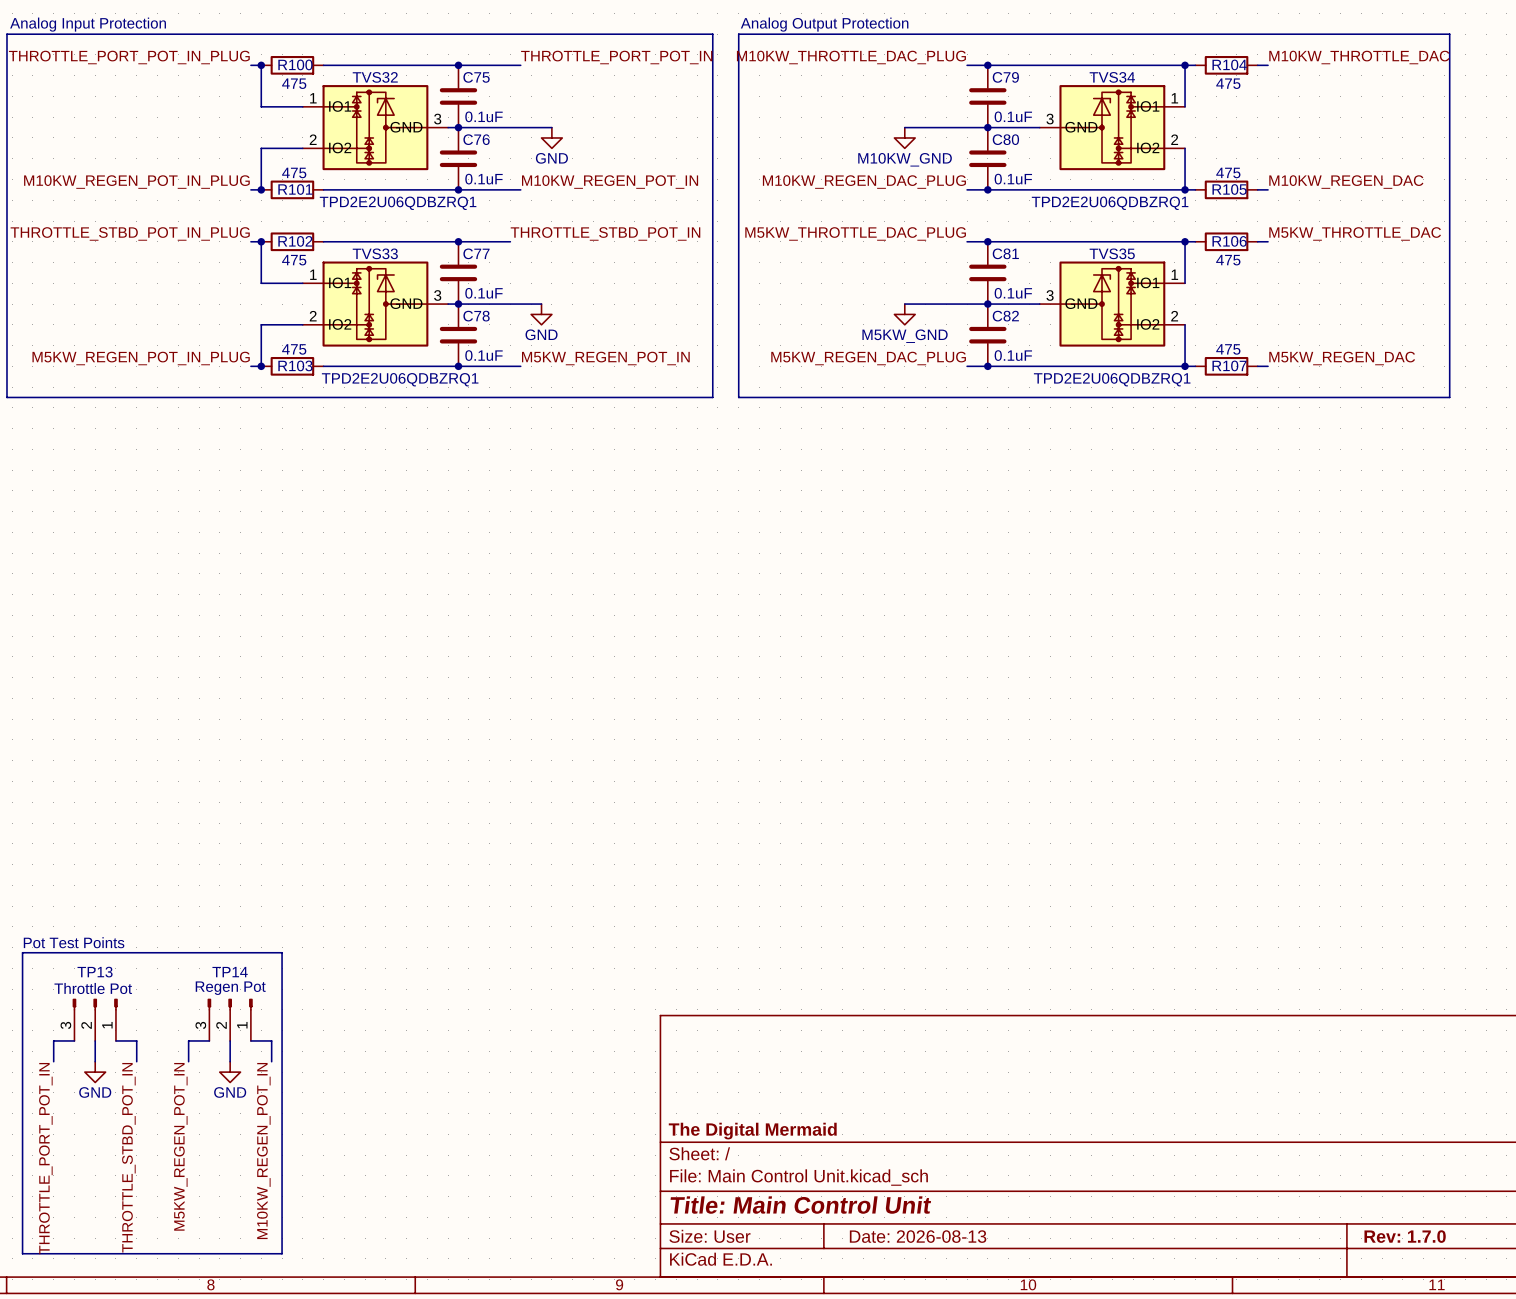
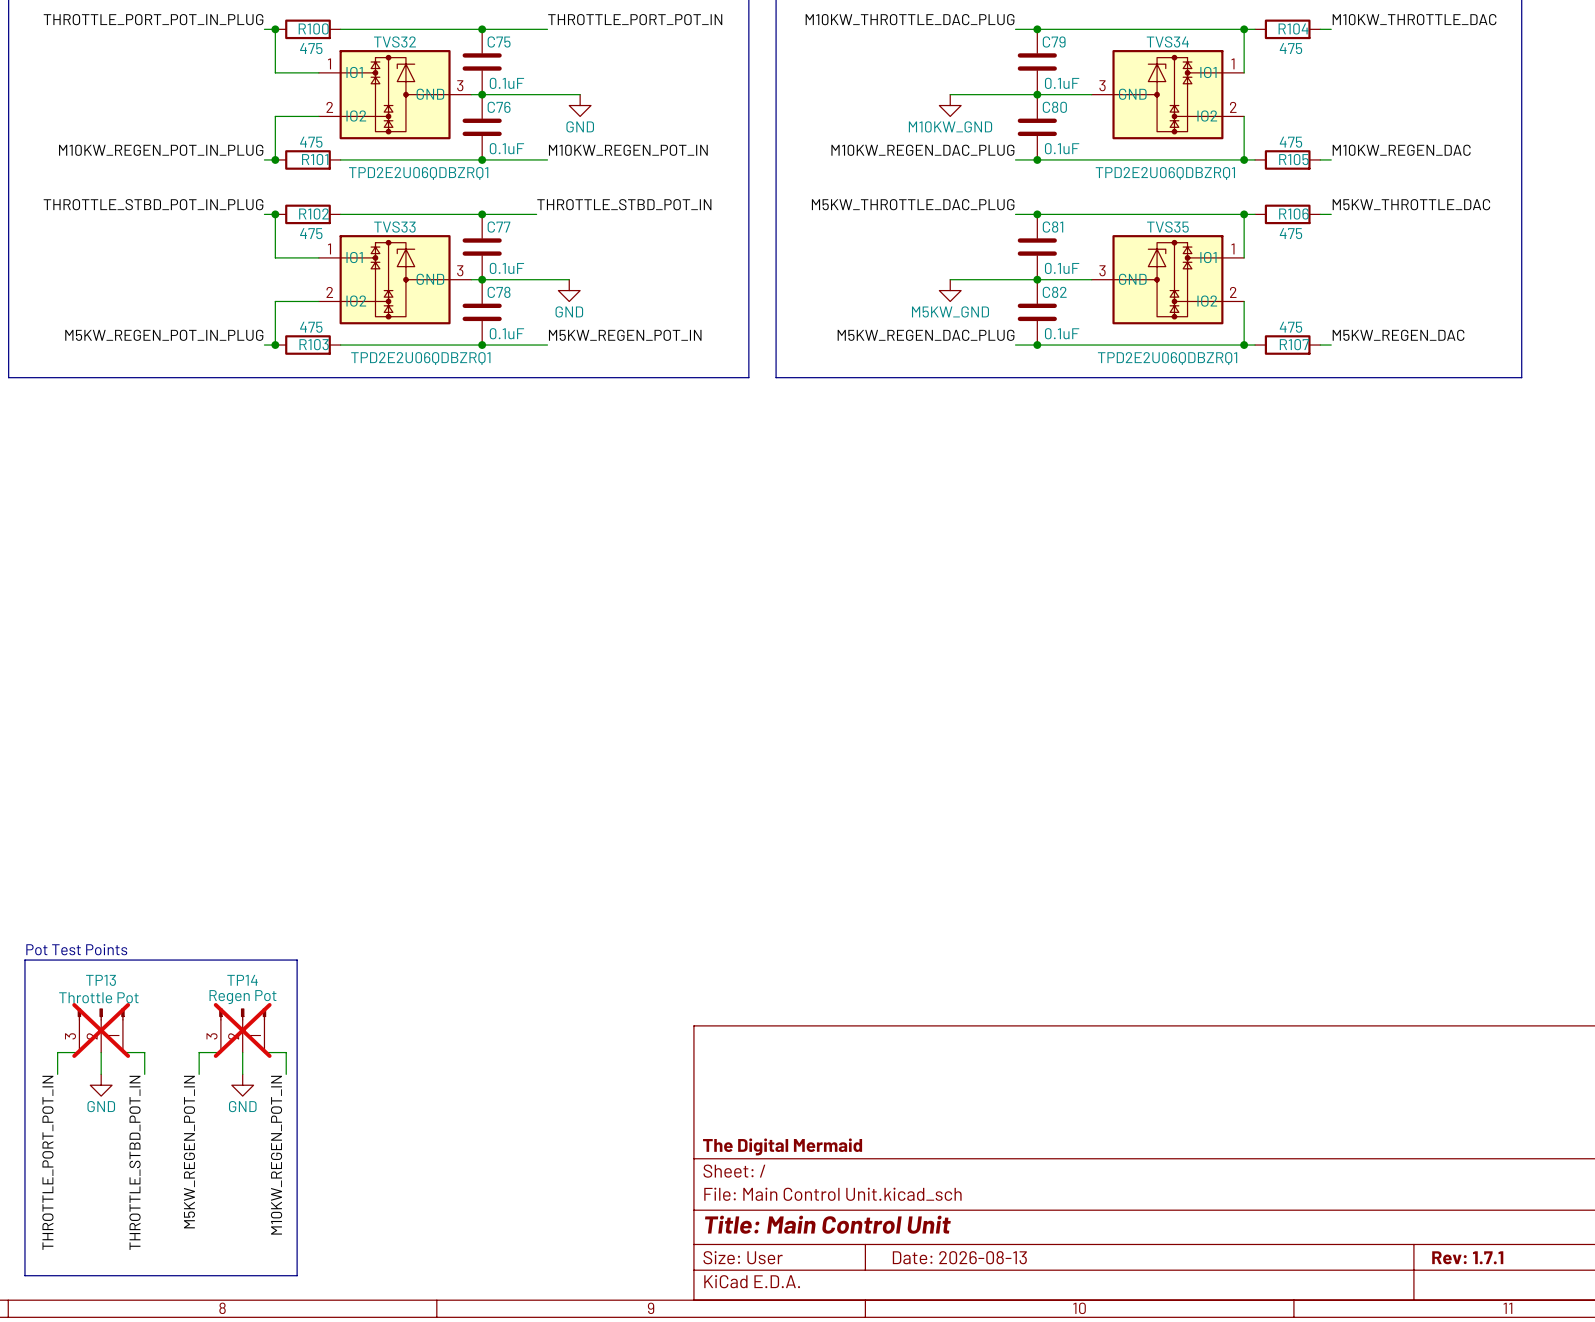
TP13 do-not-place cross: none -> (101, 1030)
TP14 do-not-place cross: none -> (242, 1030)
title block: Rev: 1.7.0 (1405, 1236) -> Rev: 1.7.1 (1467, 1257)

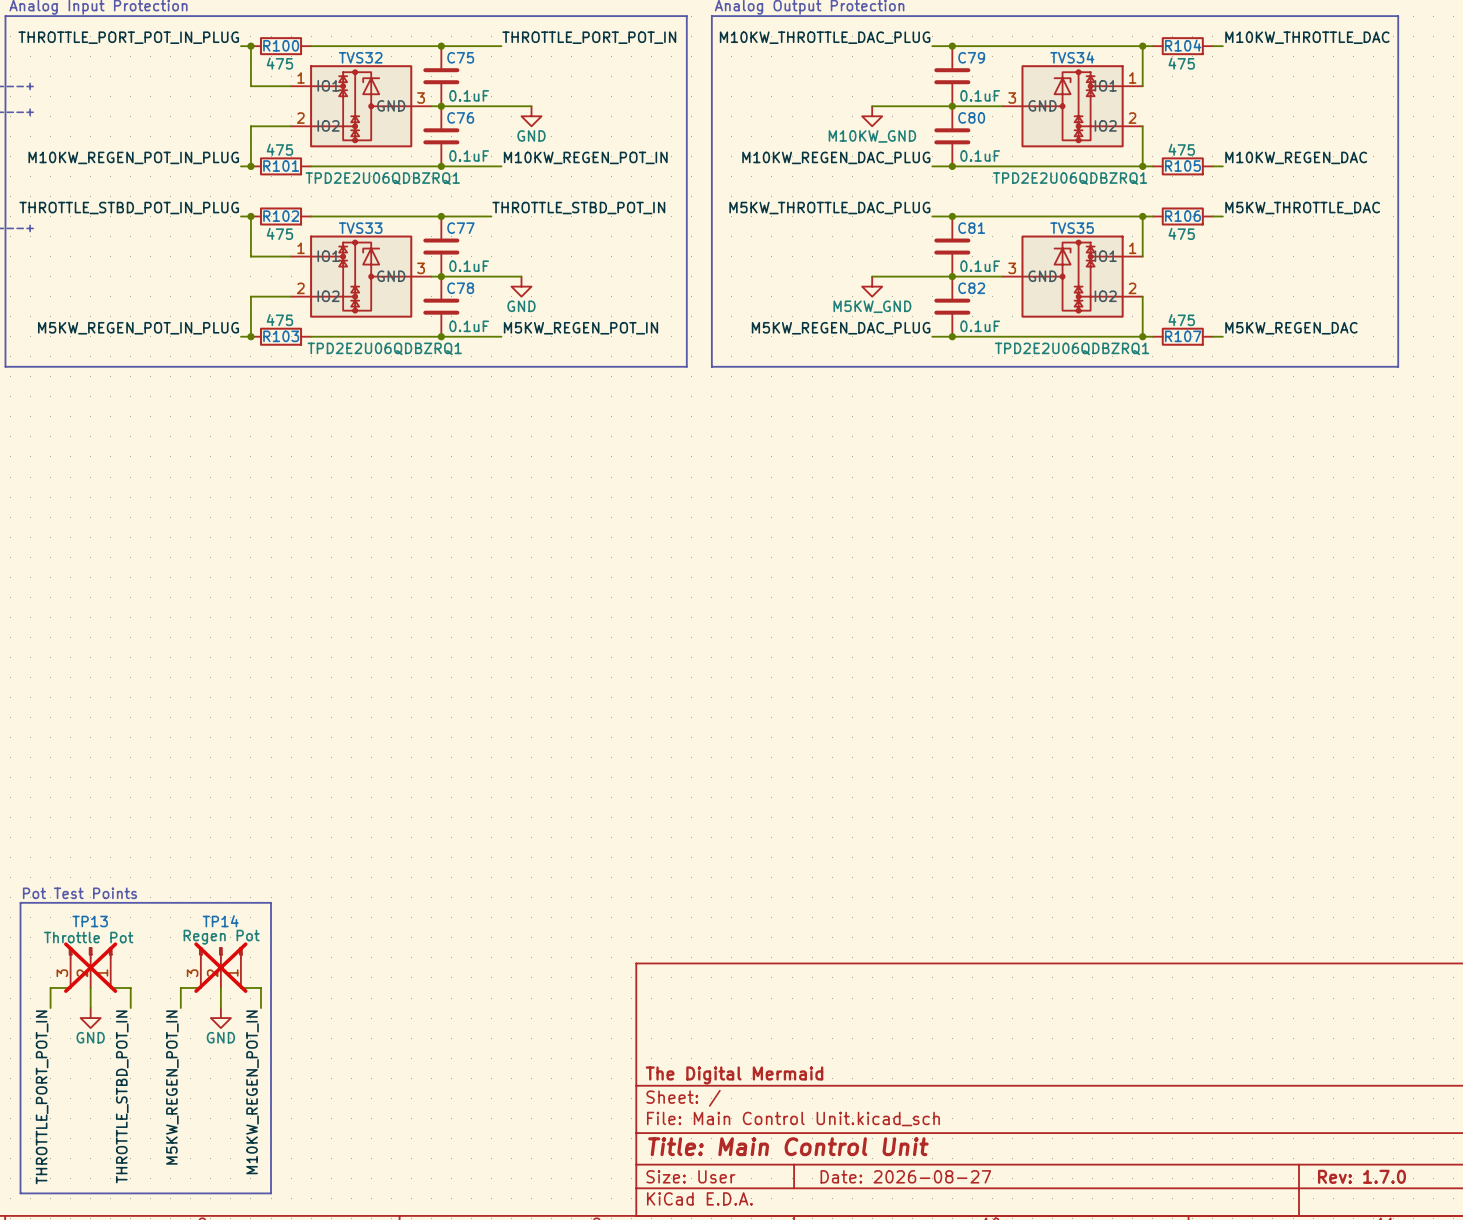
title block: Date: 2026-08-13 (959, 1257) -> Date: 2026-08-27 (905, 1176)
title block: Rev: 1.7.1 (1467, 1257) -> Rev: 1.7.0 (1361, 1176)

